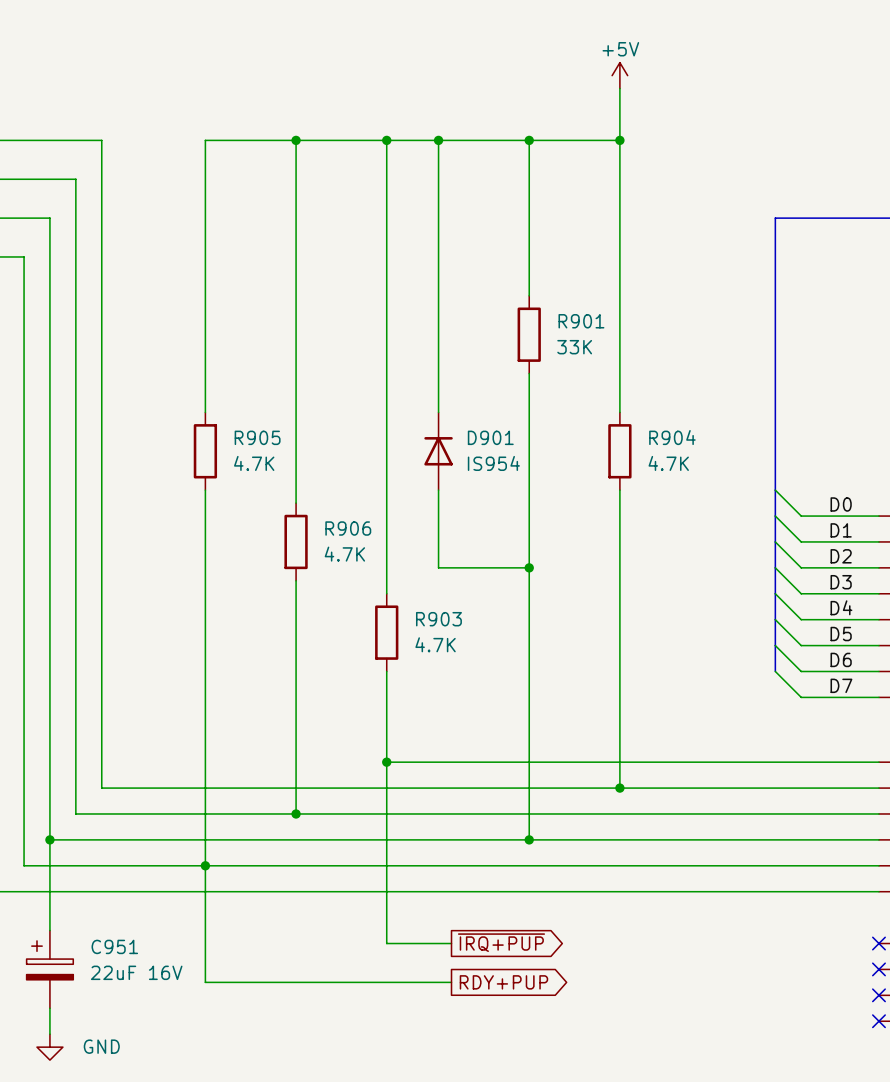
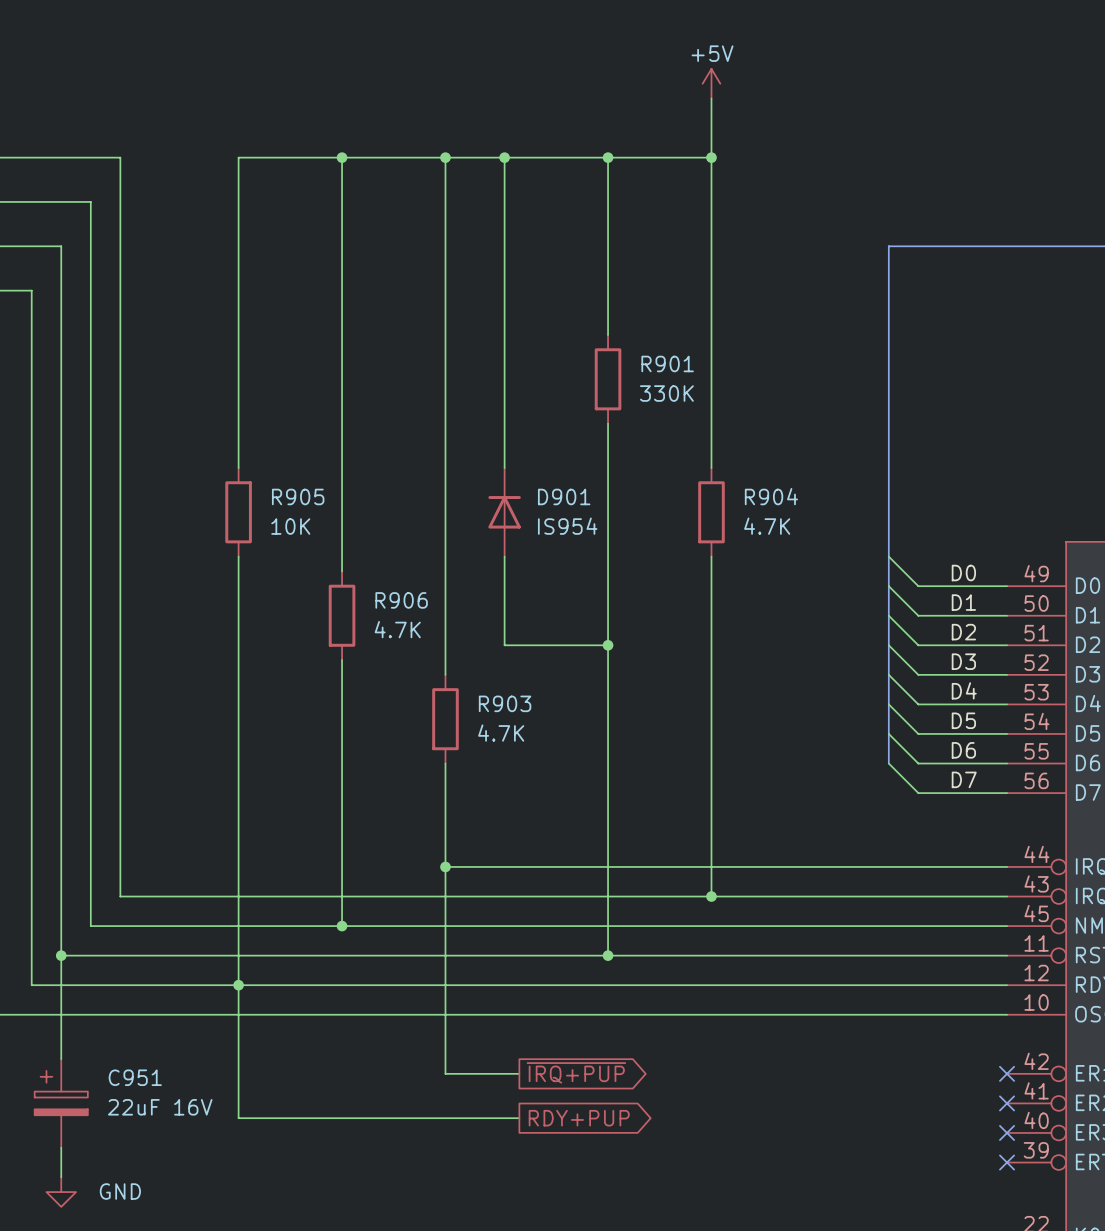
R901 value: 33K (574, 347) -> 330K (666, 393)
R905 value: 4.7K (254, 463) -> 10K (290, 526)

